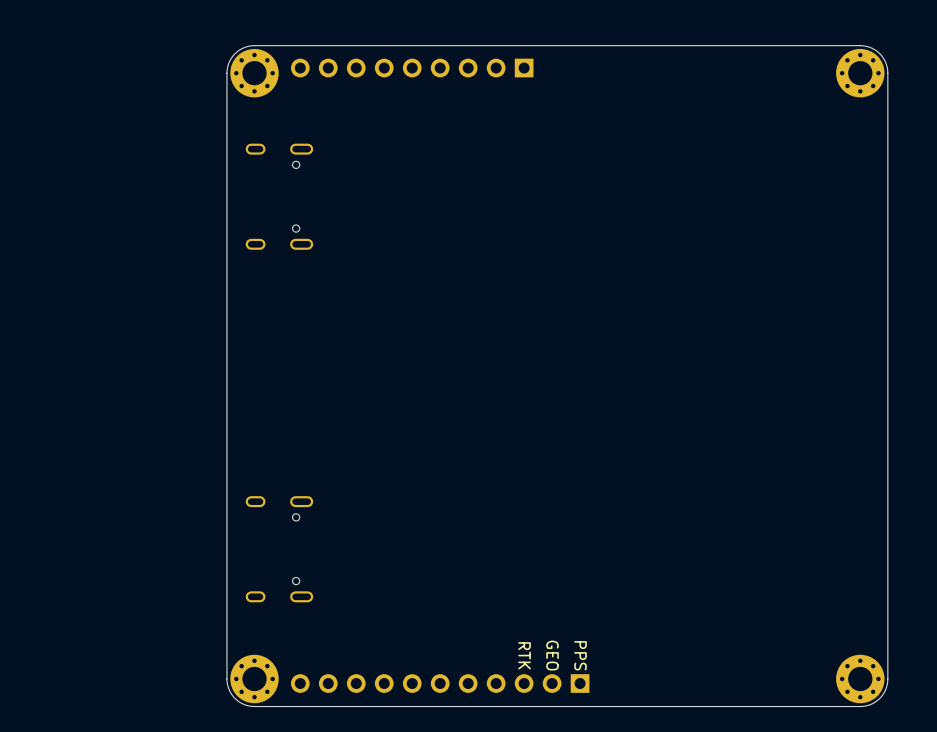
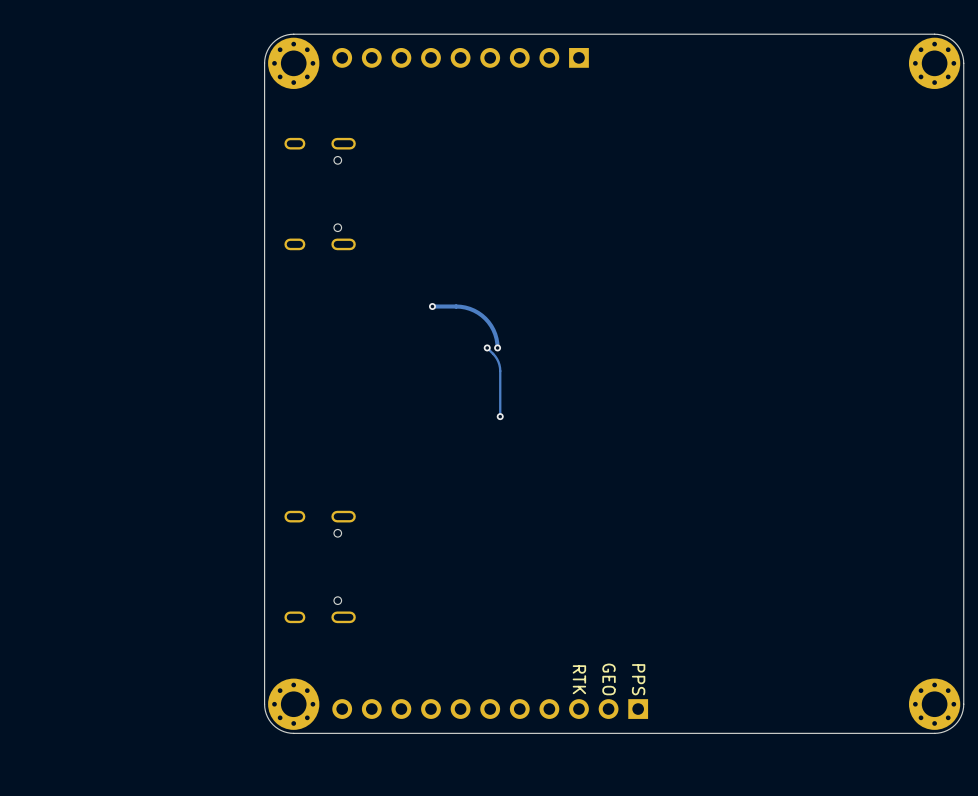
track: none -> (432, 306) (460, 306) (478, 312) (491, 325) (495, 334) (497, 347)
via: none -> (432, 306)
track: none -> (487, 347) (496, 358) (500, 367) (500, 416)
via: none -> (487, 347)
via: none -> (497, 347)
via: none -> (500, 416)

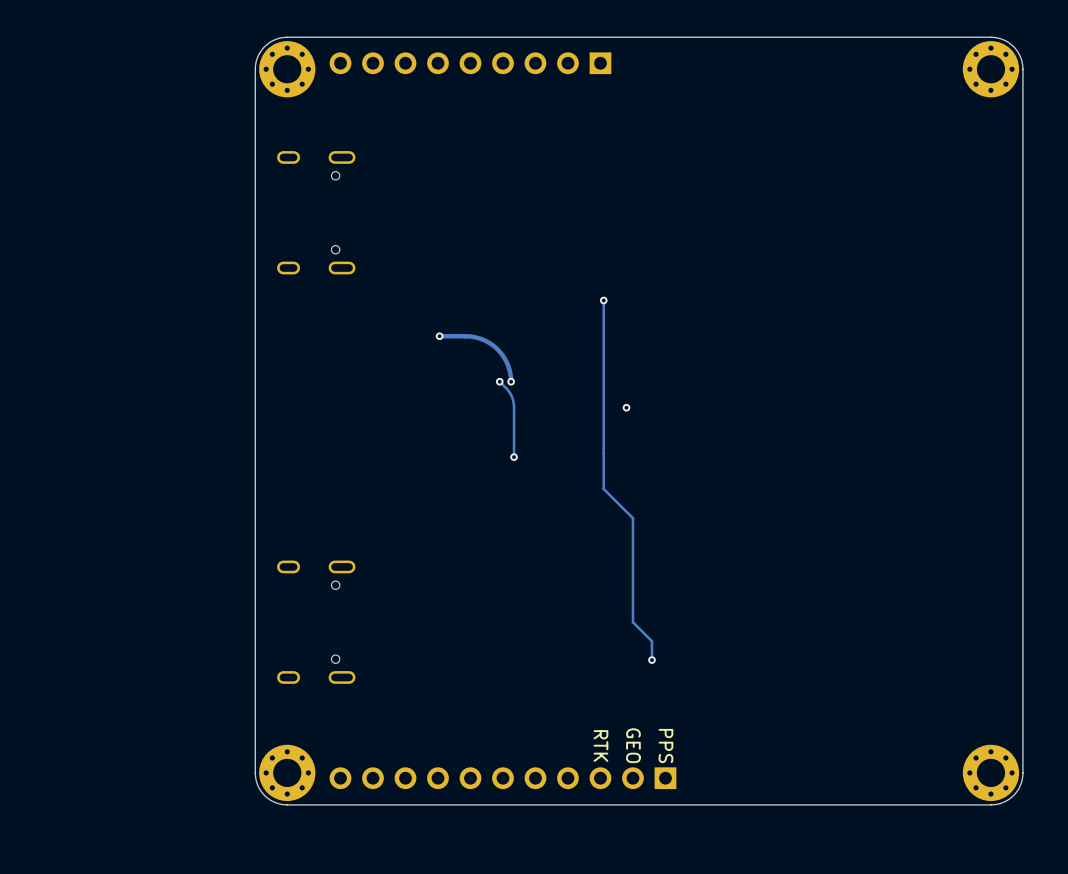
track: none -> (603, 300) (603, 488) (632, 518) (632, 622) (651, 641) (651, 660)
via: none -> (603, 300)
via: none -> (626, 407)
via: none -> (651, 660)

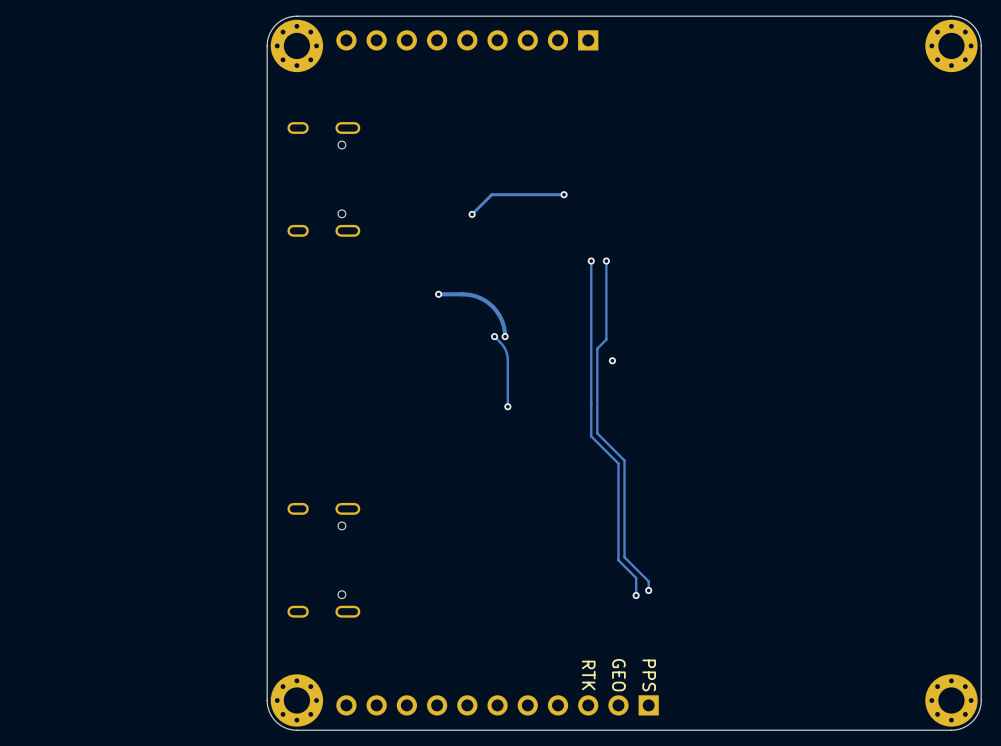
track: none -> (564, 194) (491, 194) (472, 214)
via: none -> (564, 194)
via: none -> (472, 214)
track: none -> (606, 261) (606, 339) (597, 348) (597, 433) (624, 460) (624, 557) (648, 581) (648, 590)
via: none -> (606, 261)
via: none -> (648, 590)

